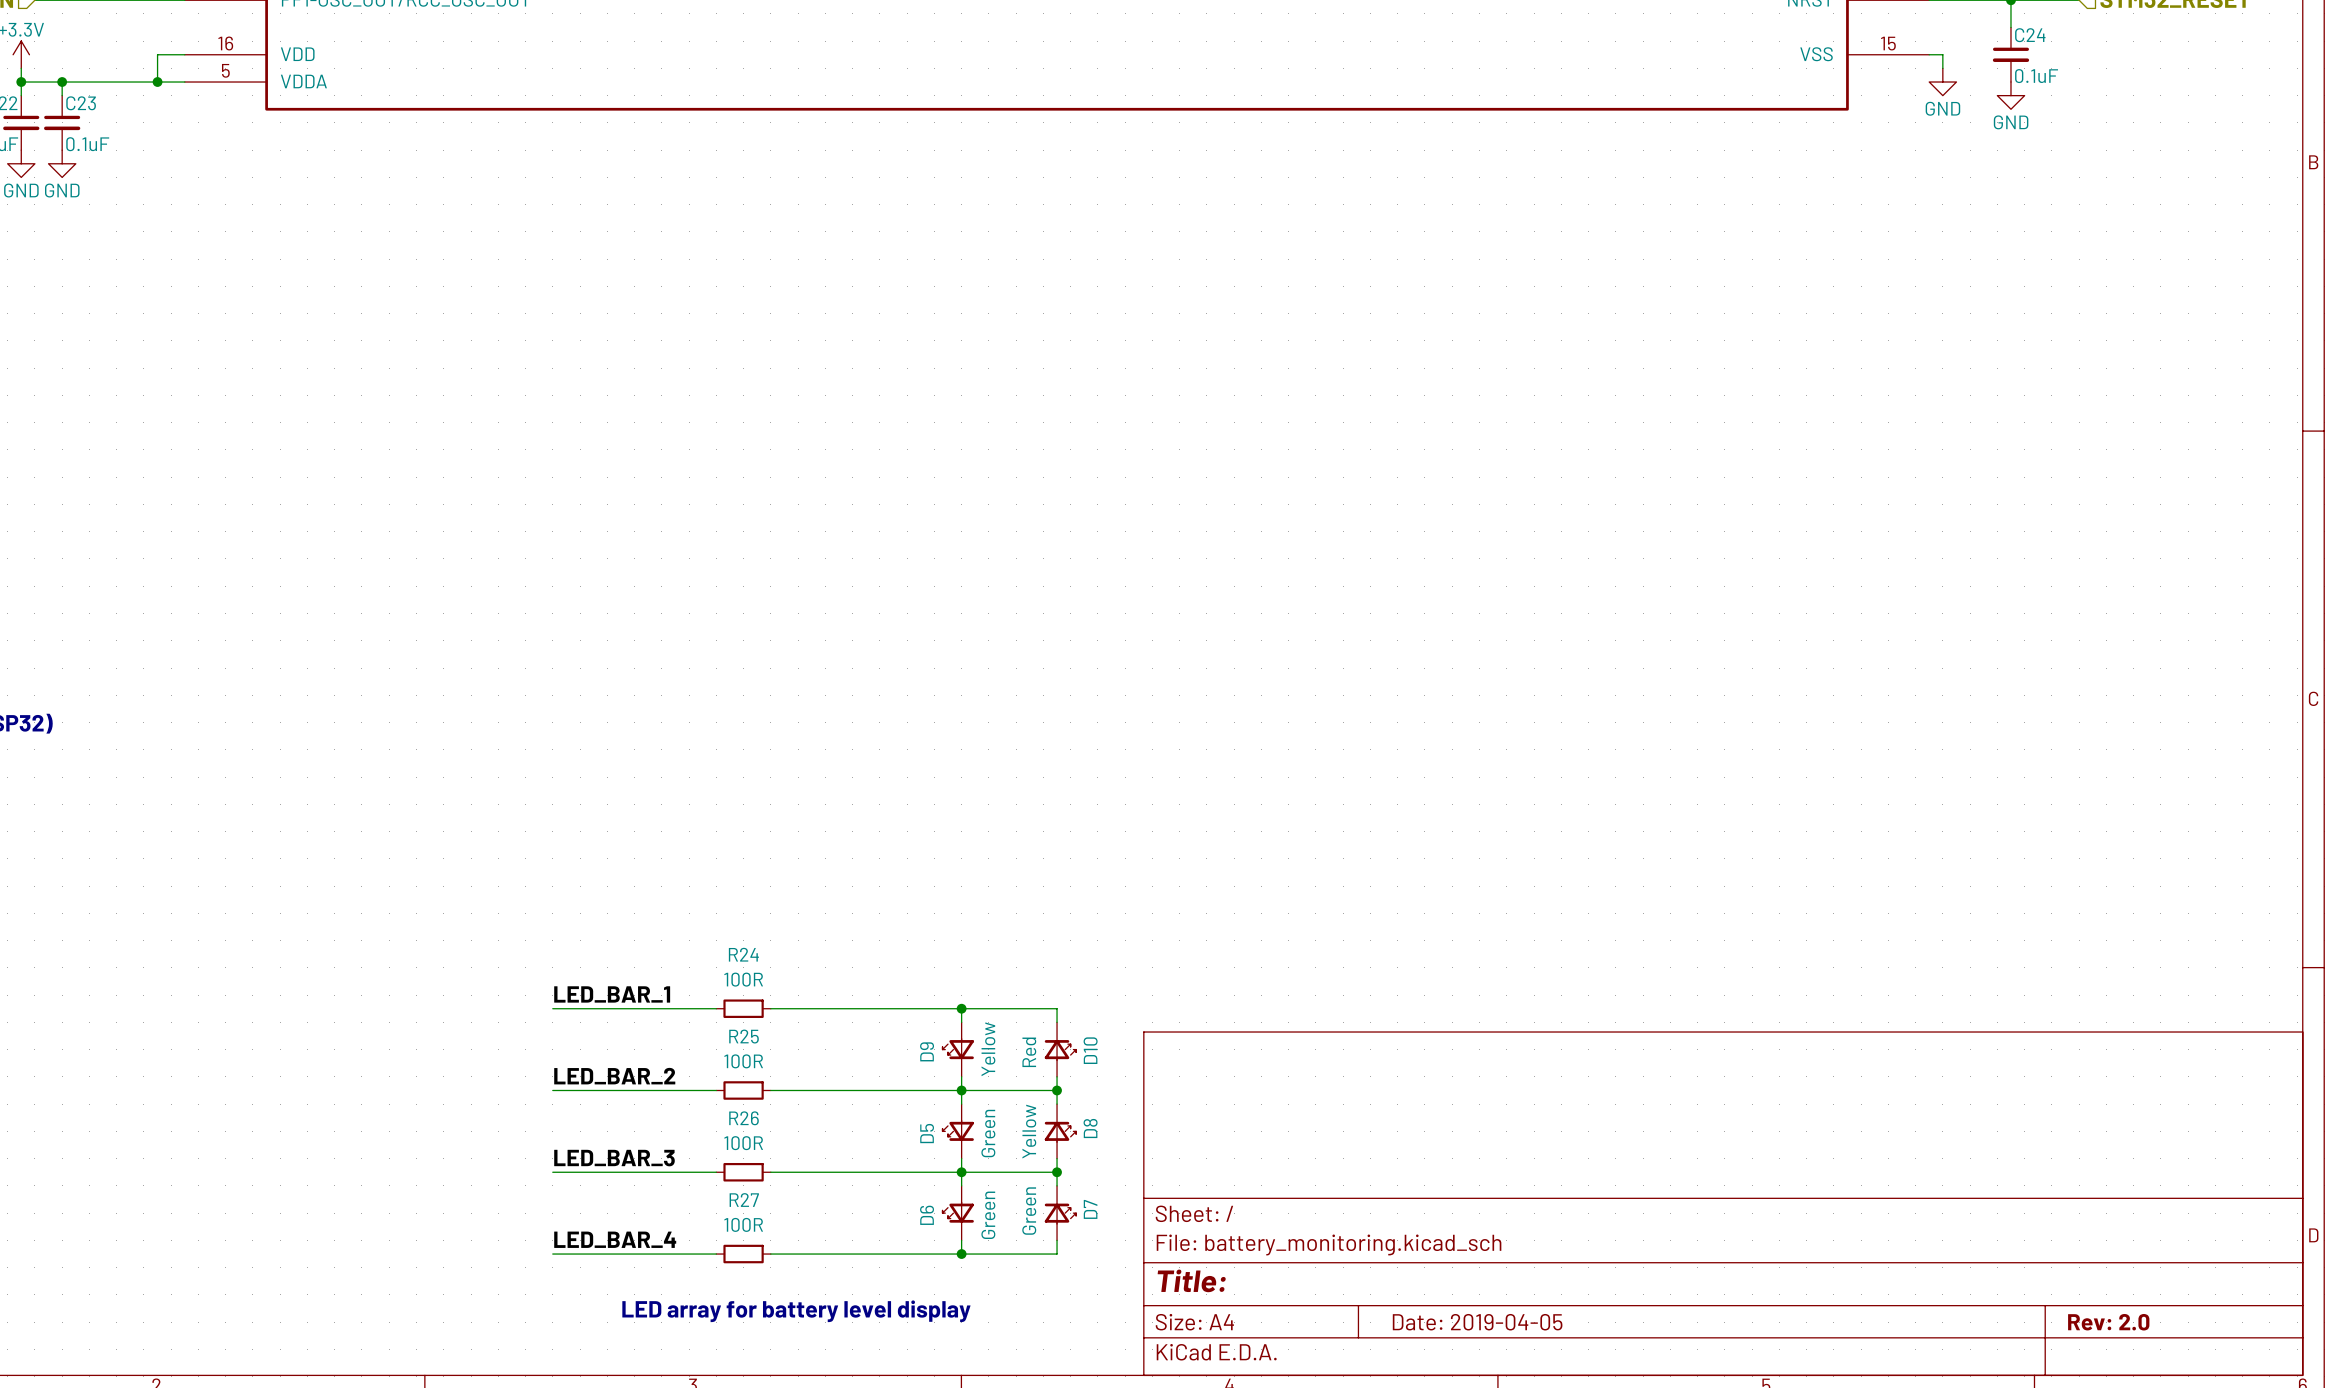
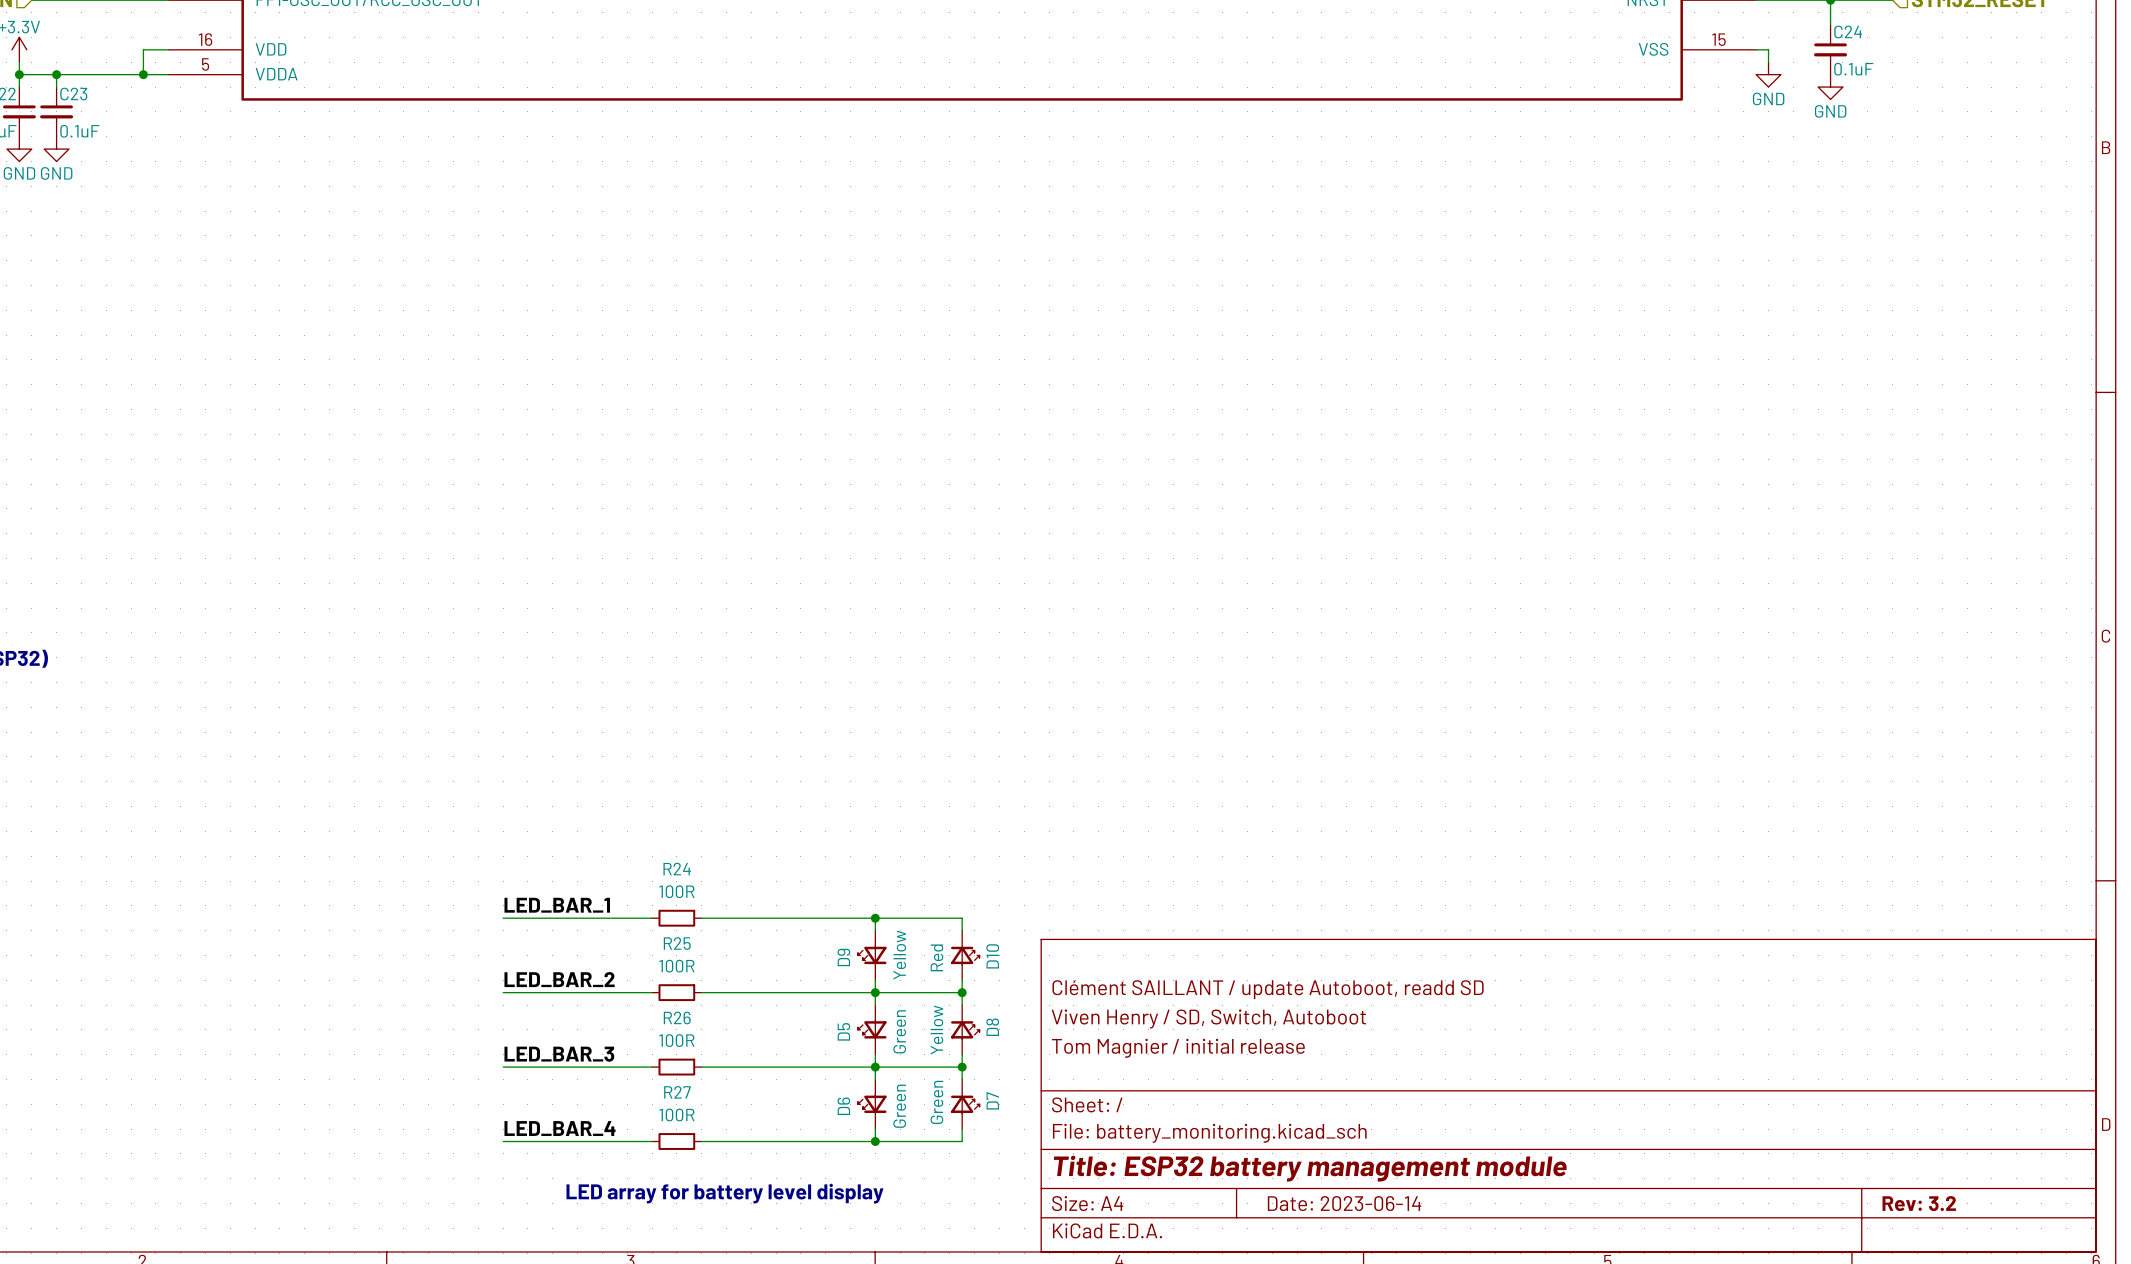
title block: none -> Clément SAILLANT / update Autoboot, readd SD (1268, 989)
title block: none -> Viven Henry / SD, Switch, Autoboot (1208, 1018)
title block: none -> Tom Magnier / initial release (1178, 1048)
title block: Title: (1191, 1280) -> Title: ESP32 battery management module (1310, 1168)
title block: Date: 2019-04-05 (1477, 1322) -> Date: 2023-06-14 (1344, 1203)
title block: Rev: 2.0 (2108, 1322) -> Rev: 3.2 (1919, 1203)

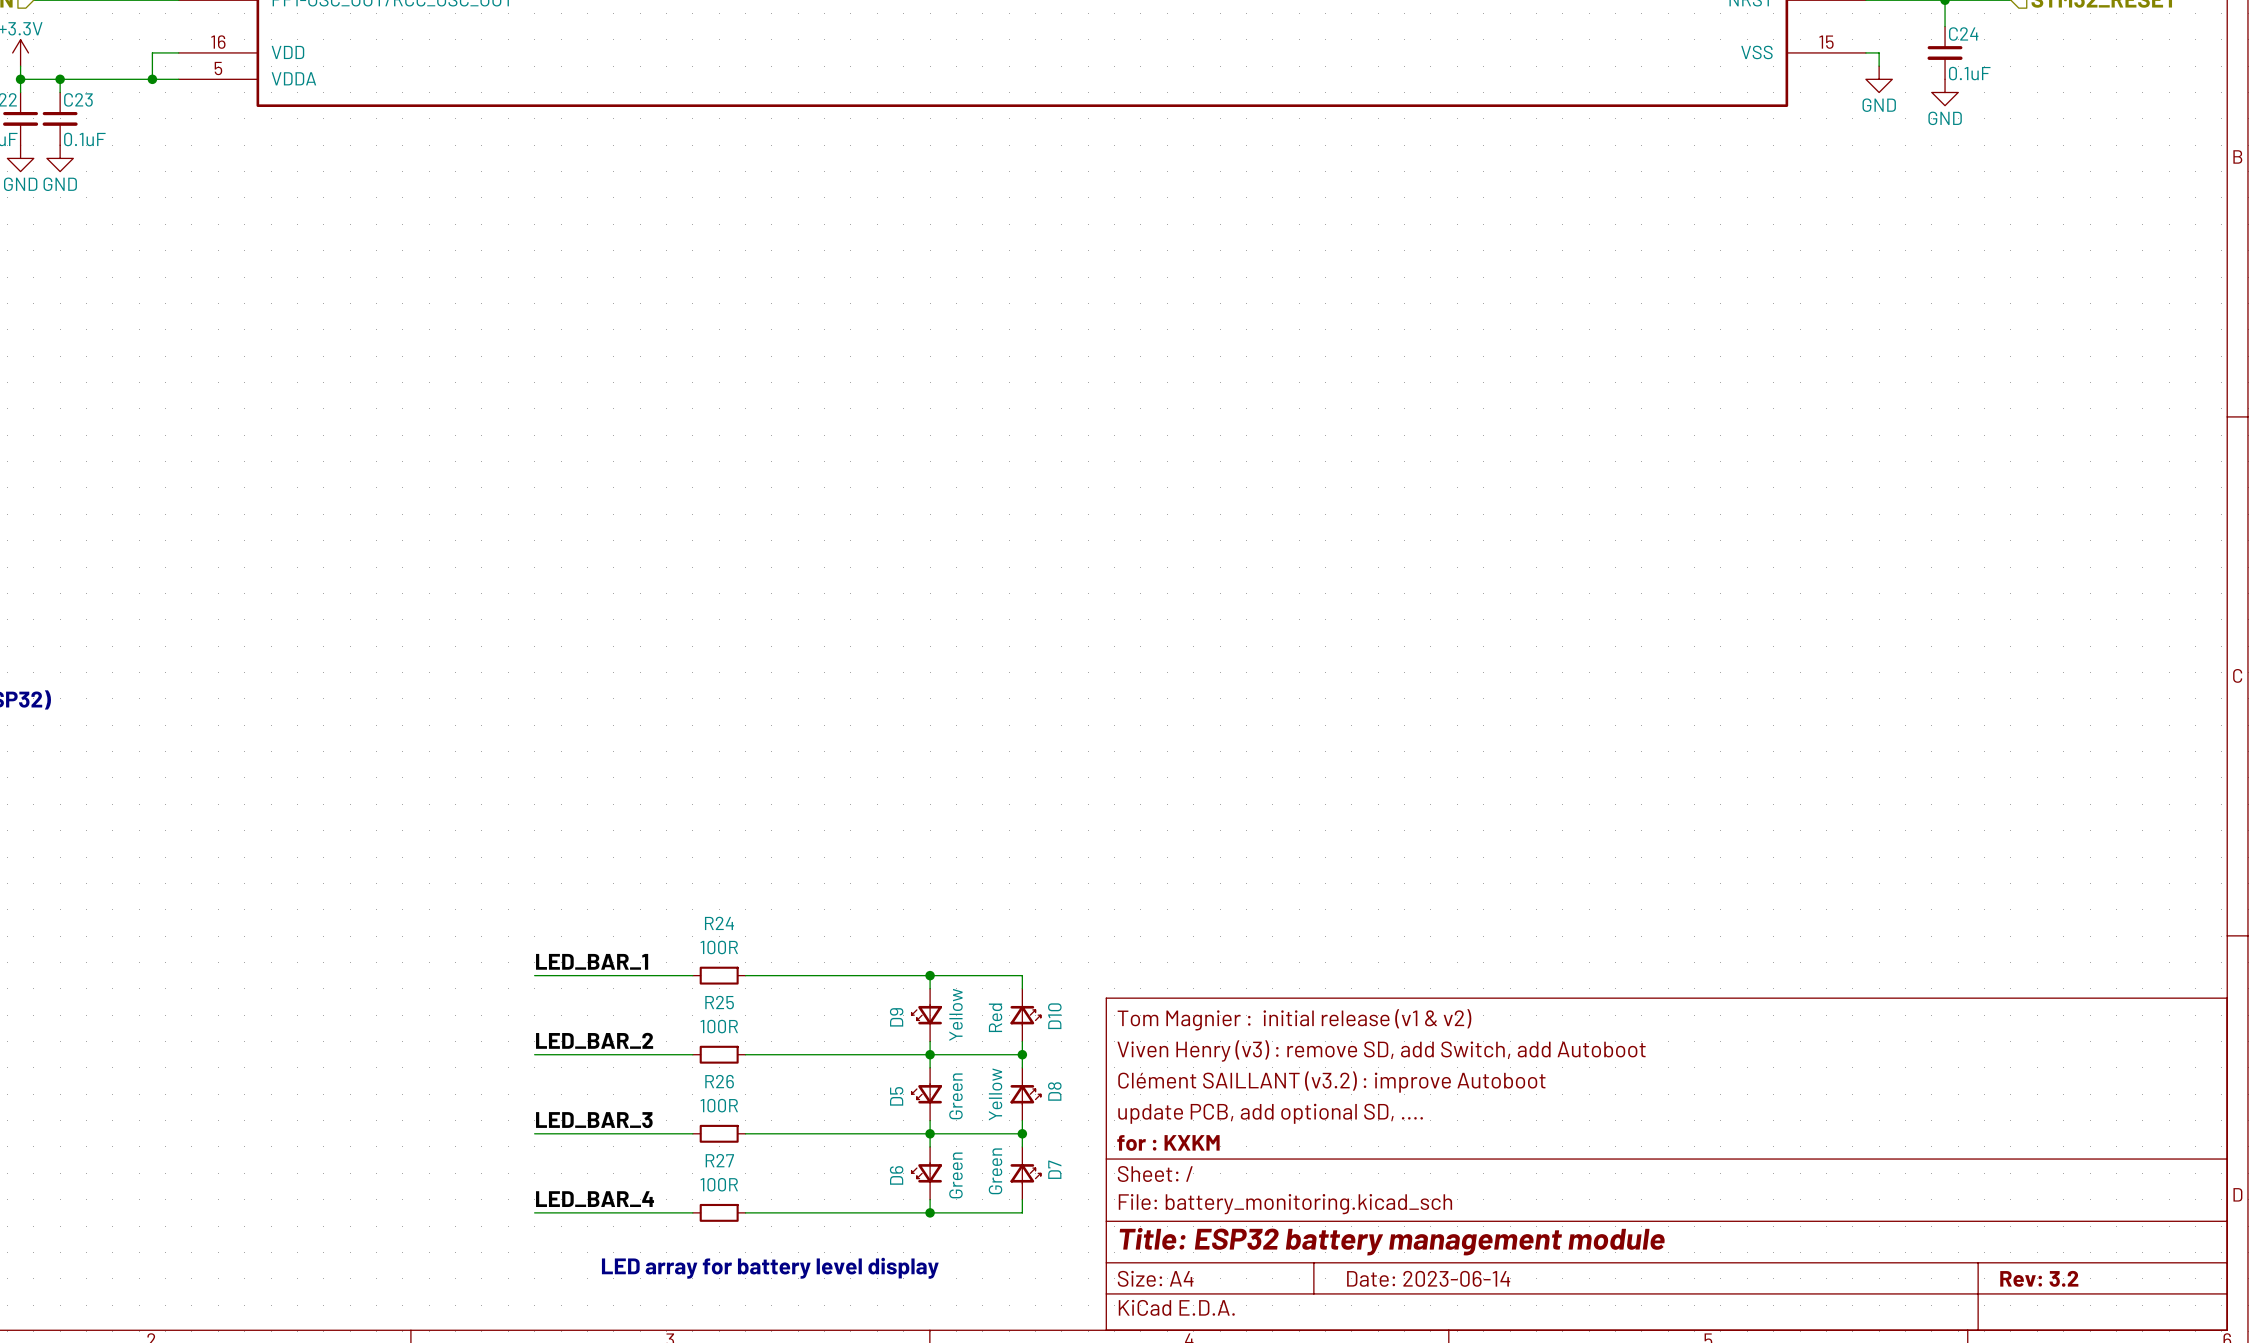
title block: none -> Tom Magnier : initial release (v1 & v2) (1294, 1019)
title block: Clément SAILLANT / update Autoboot, readd SD (1268, 989) -> Viven Henry (v3) : remove SD, add Switch, add Autoboot (1381, 1050)
title block: Viven Henry / SD, Switch, Autoboot (1208, 1018) -> Clément SAILLANT (v3.2) : improve Autoboot (1331, 1082)
title block: Tom Magnier / initial release (1178, 1048) -> update PCB, add optional SD, .... (1270, 1113)
title block: none -> for : KXKM (1168, 1142)

